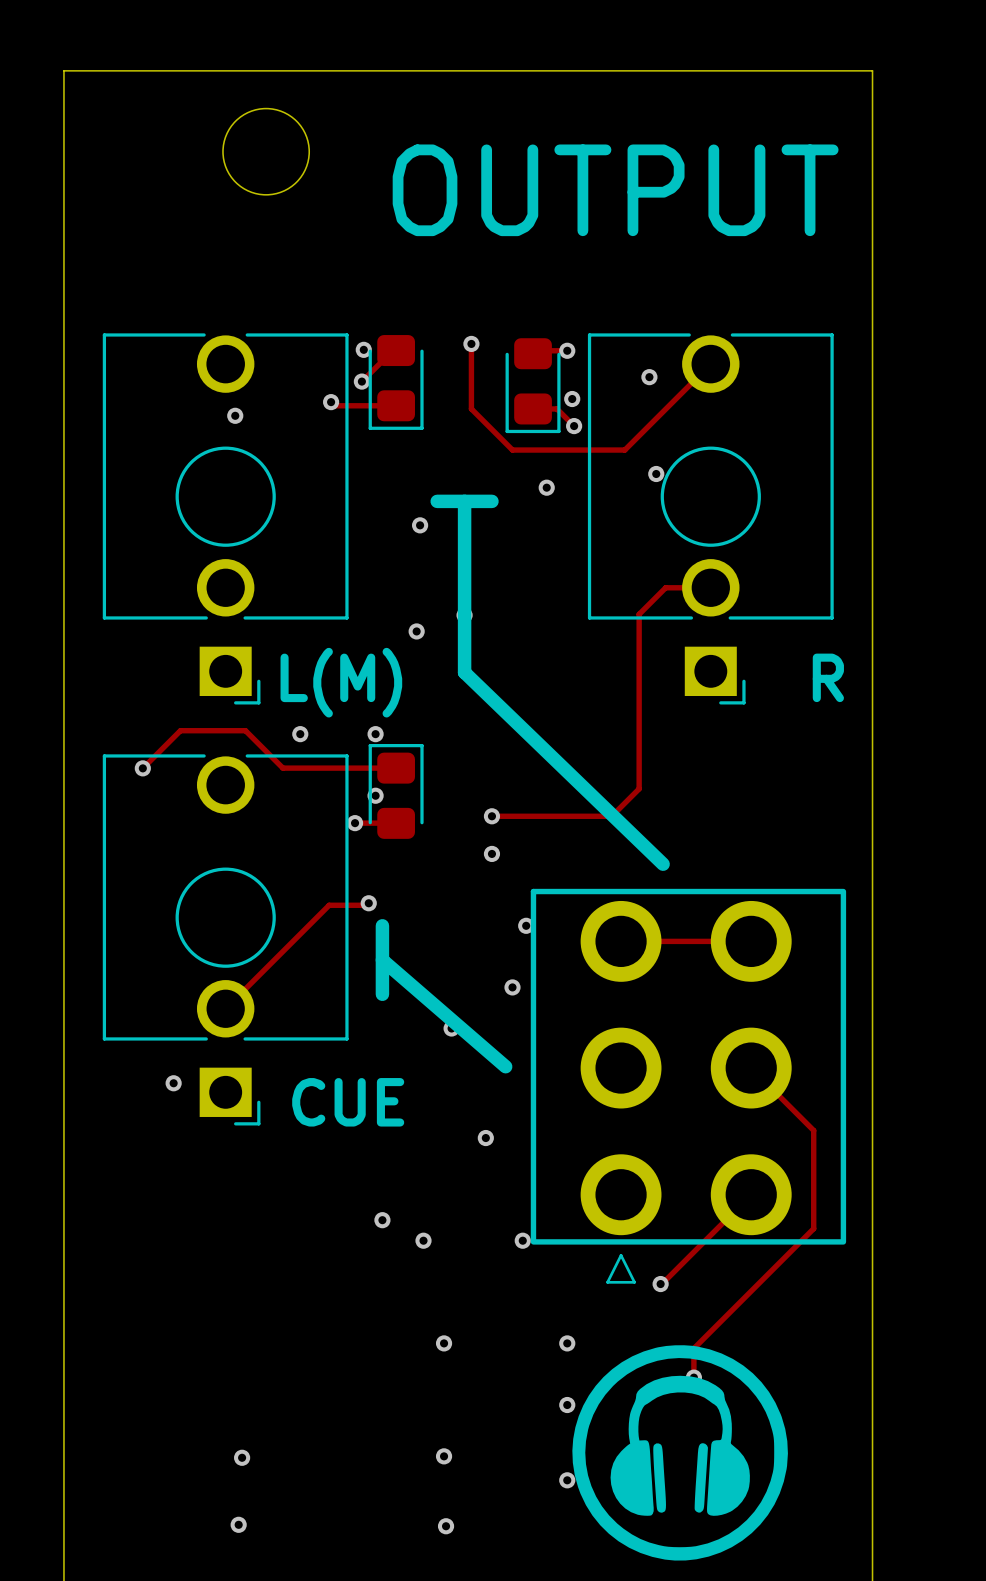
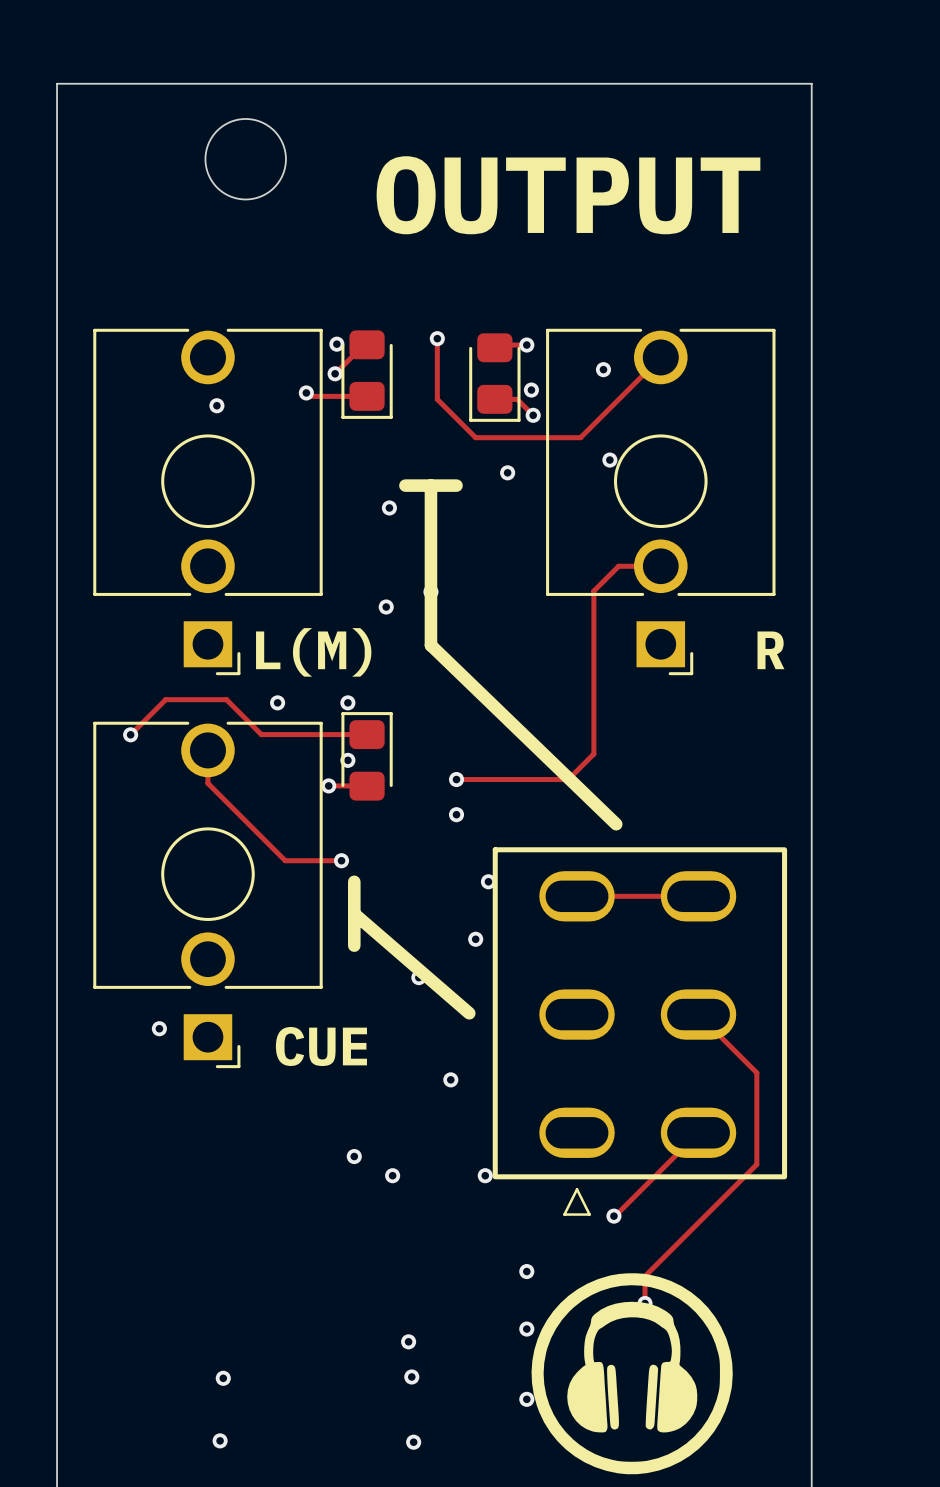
track: none -> (207, 750) (207, 783) (285, 860) (341, 860)
part footprint: [530, 888, 847, 1284] -> [492, 847, 788, 1216]
track: (368, 905) (329, 905) (225, 1008) -> none
via position: (444, 1343) -> (408, 1341)

